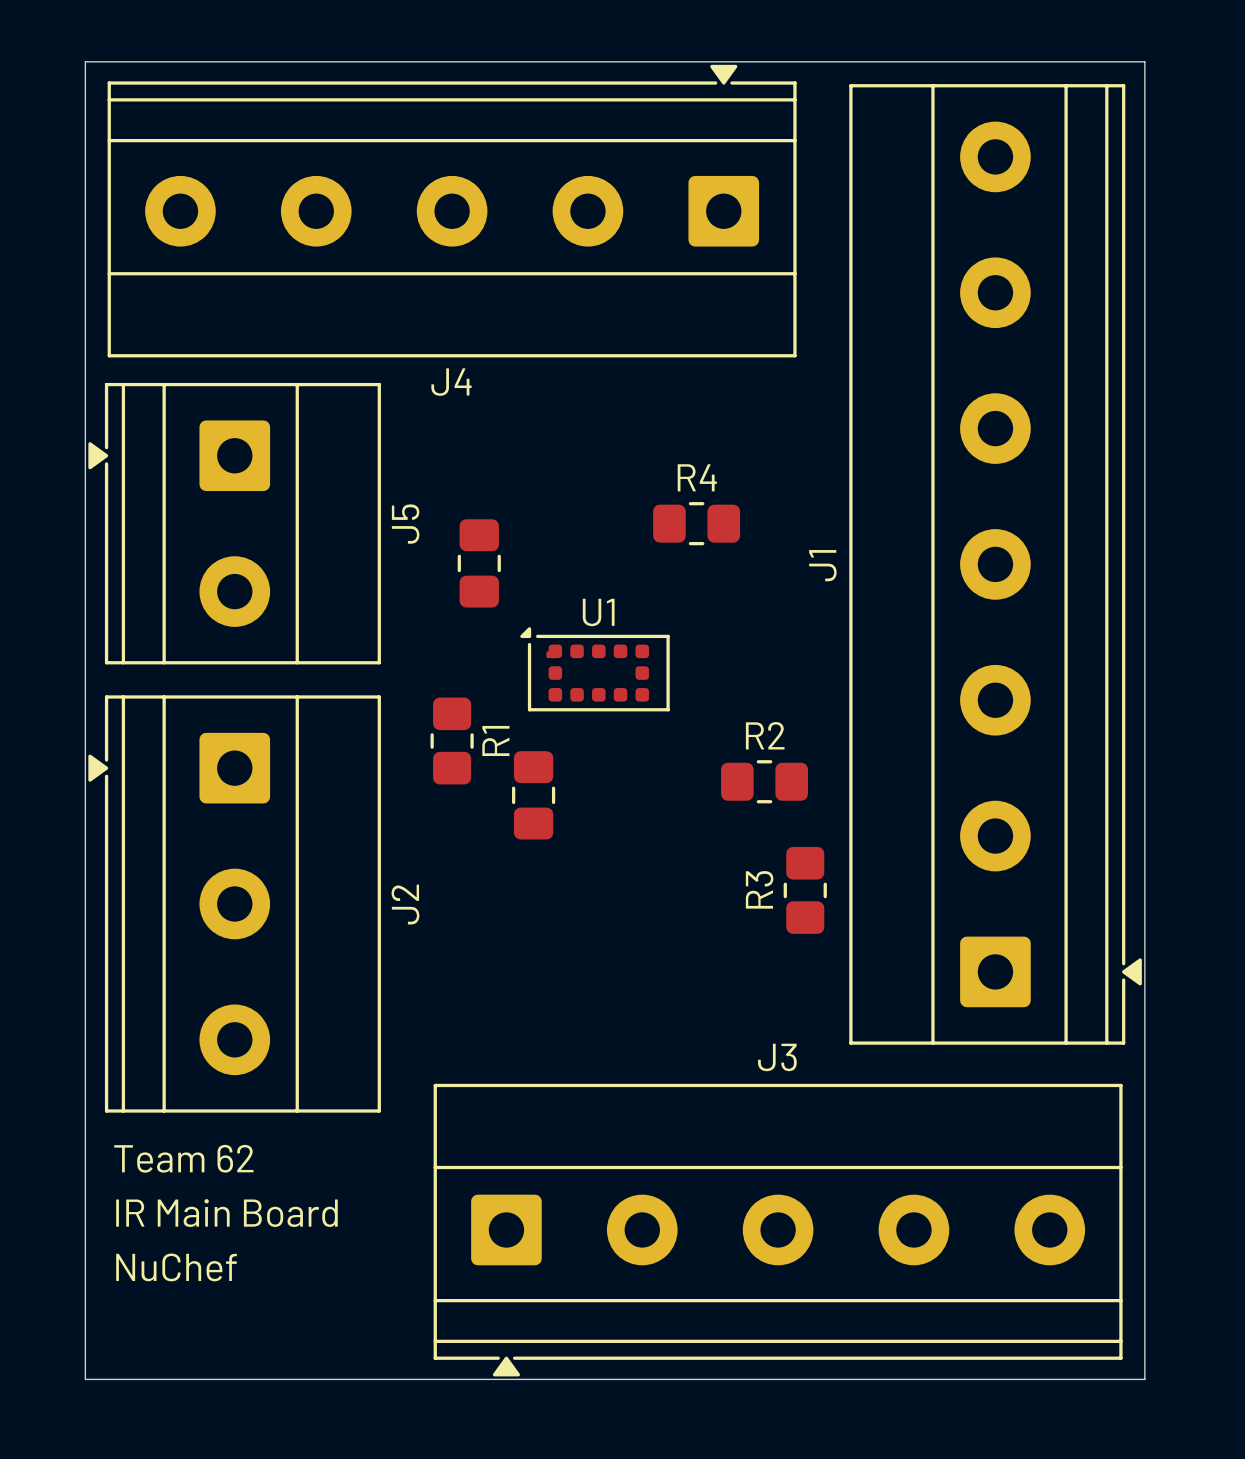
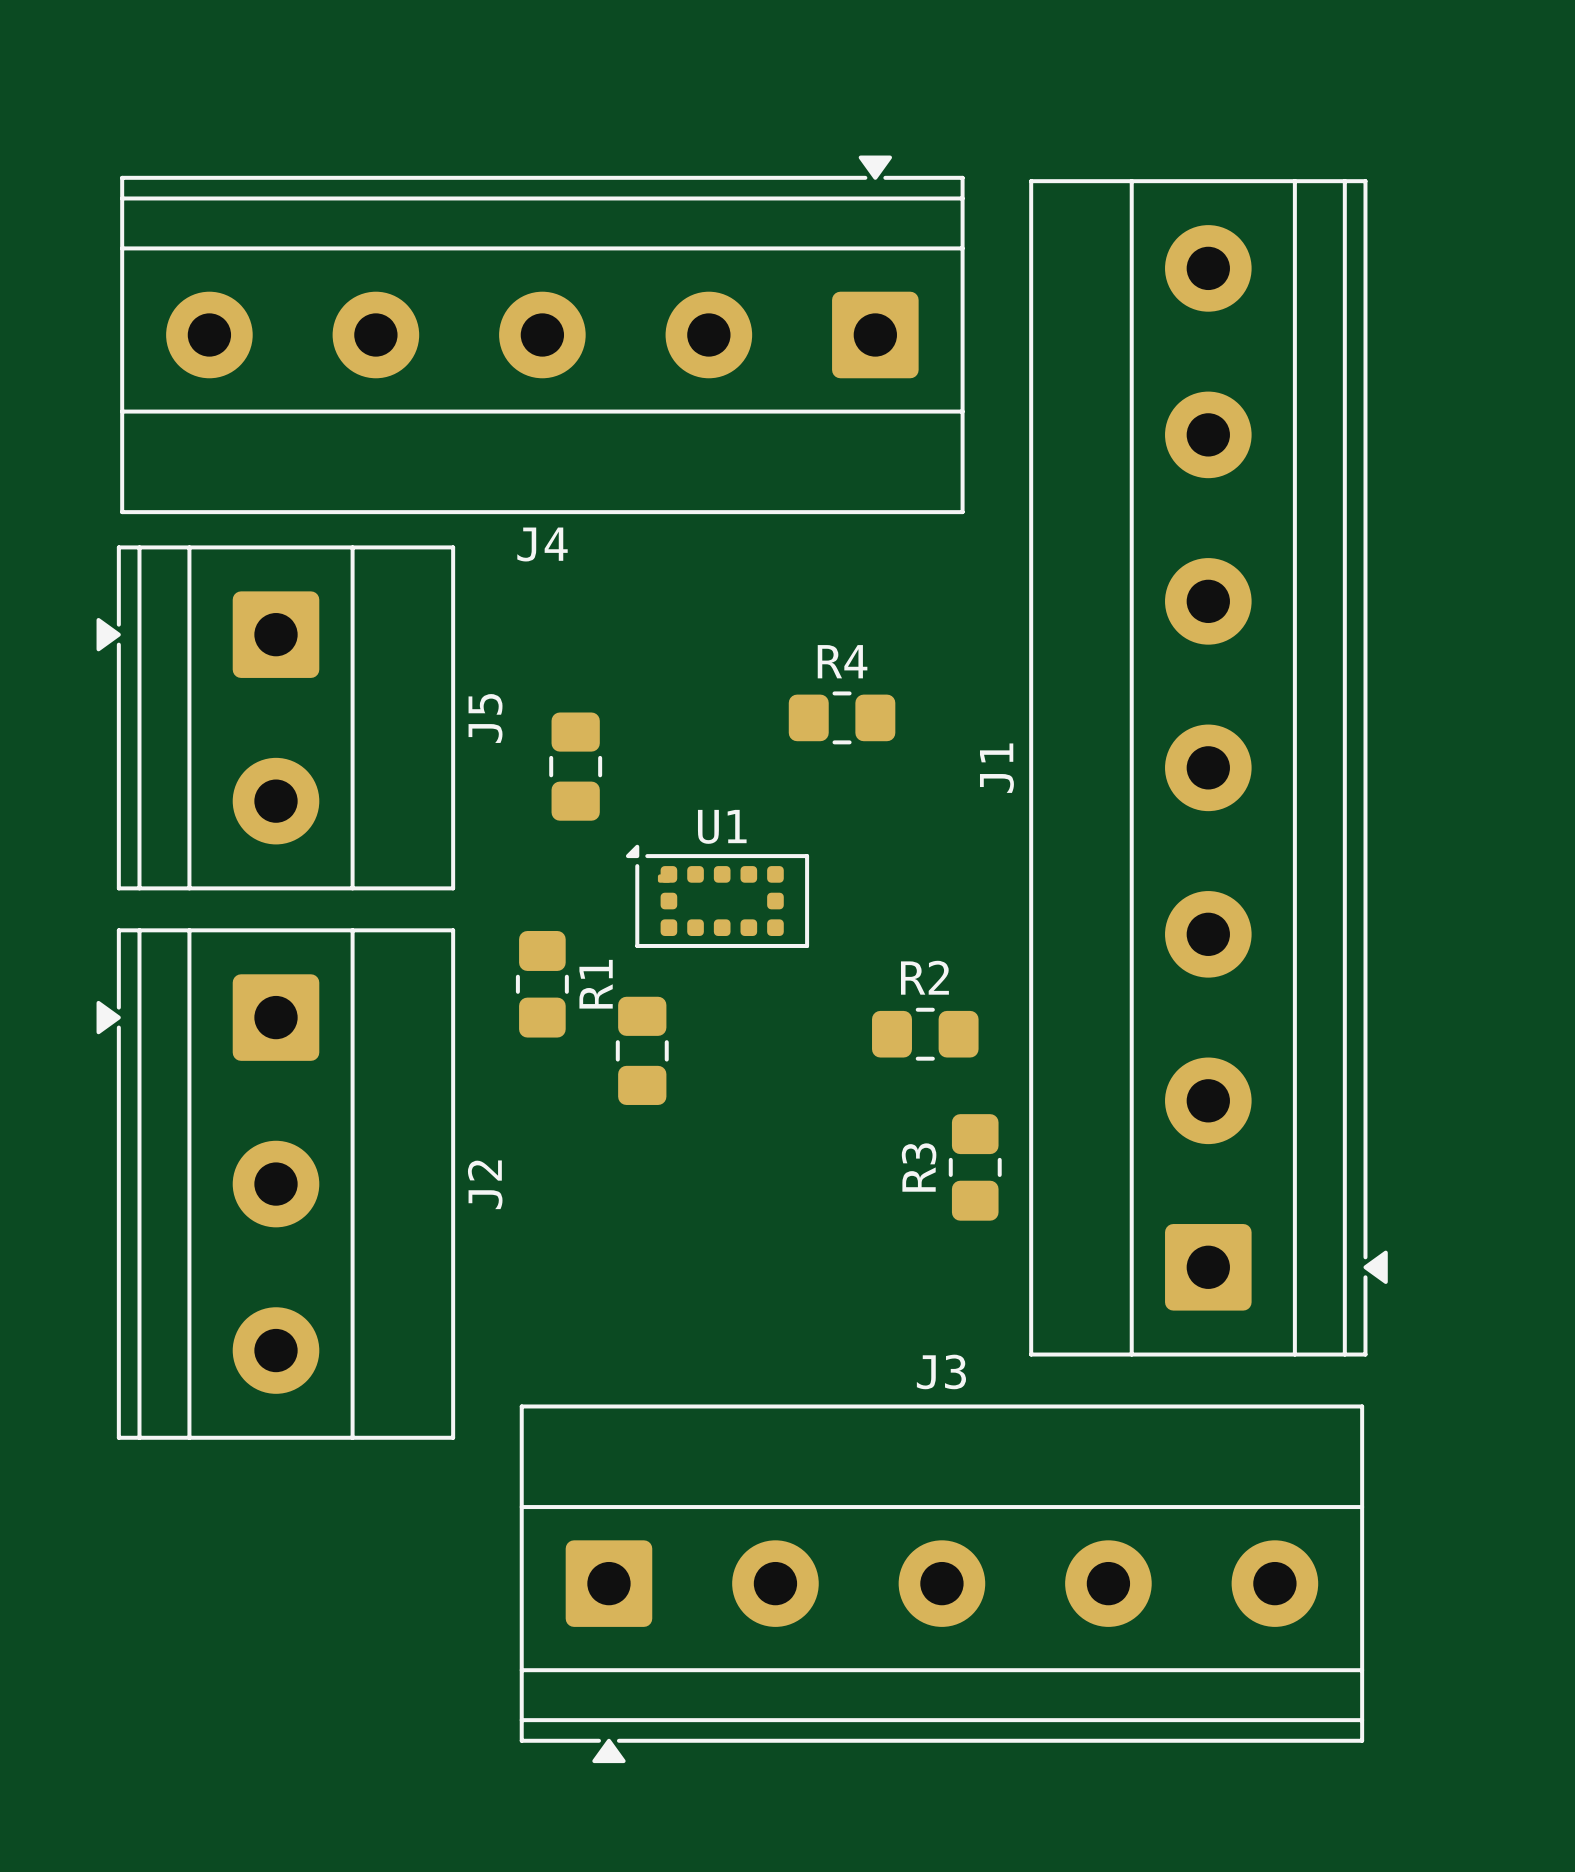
board edge: (85, 61) (1144, 61) (1144, 1379) (85, 1379) (85, 61) -> none
text: Team 62 (183, 1158) -> none
text: IR Main Board (226, 1213) -> none
text: NuChef (176, 1267) -> none

